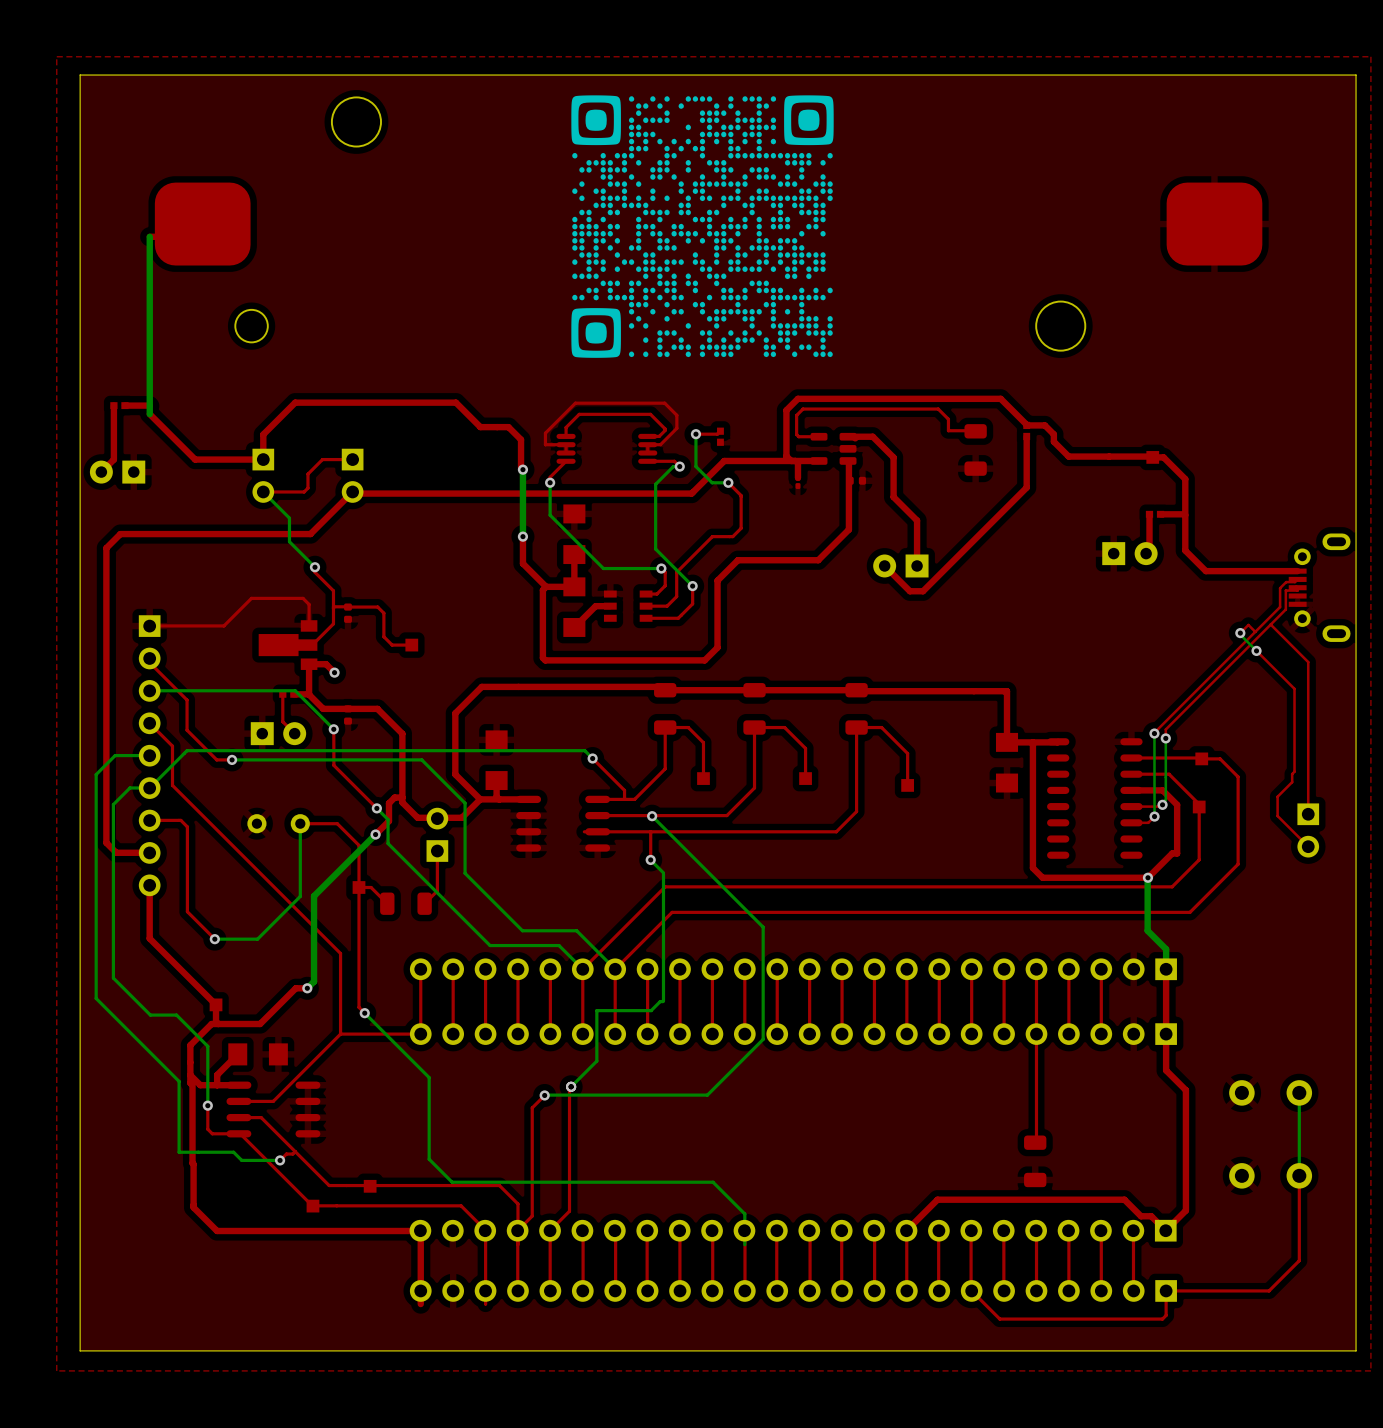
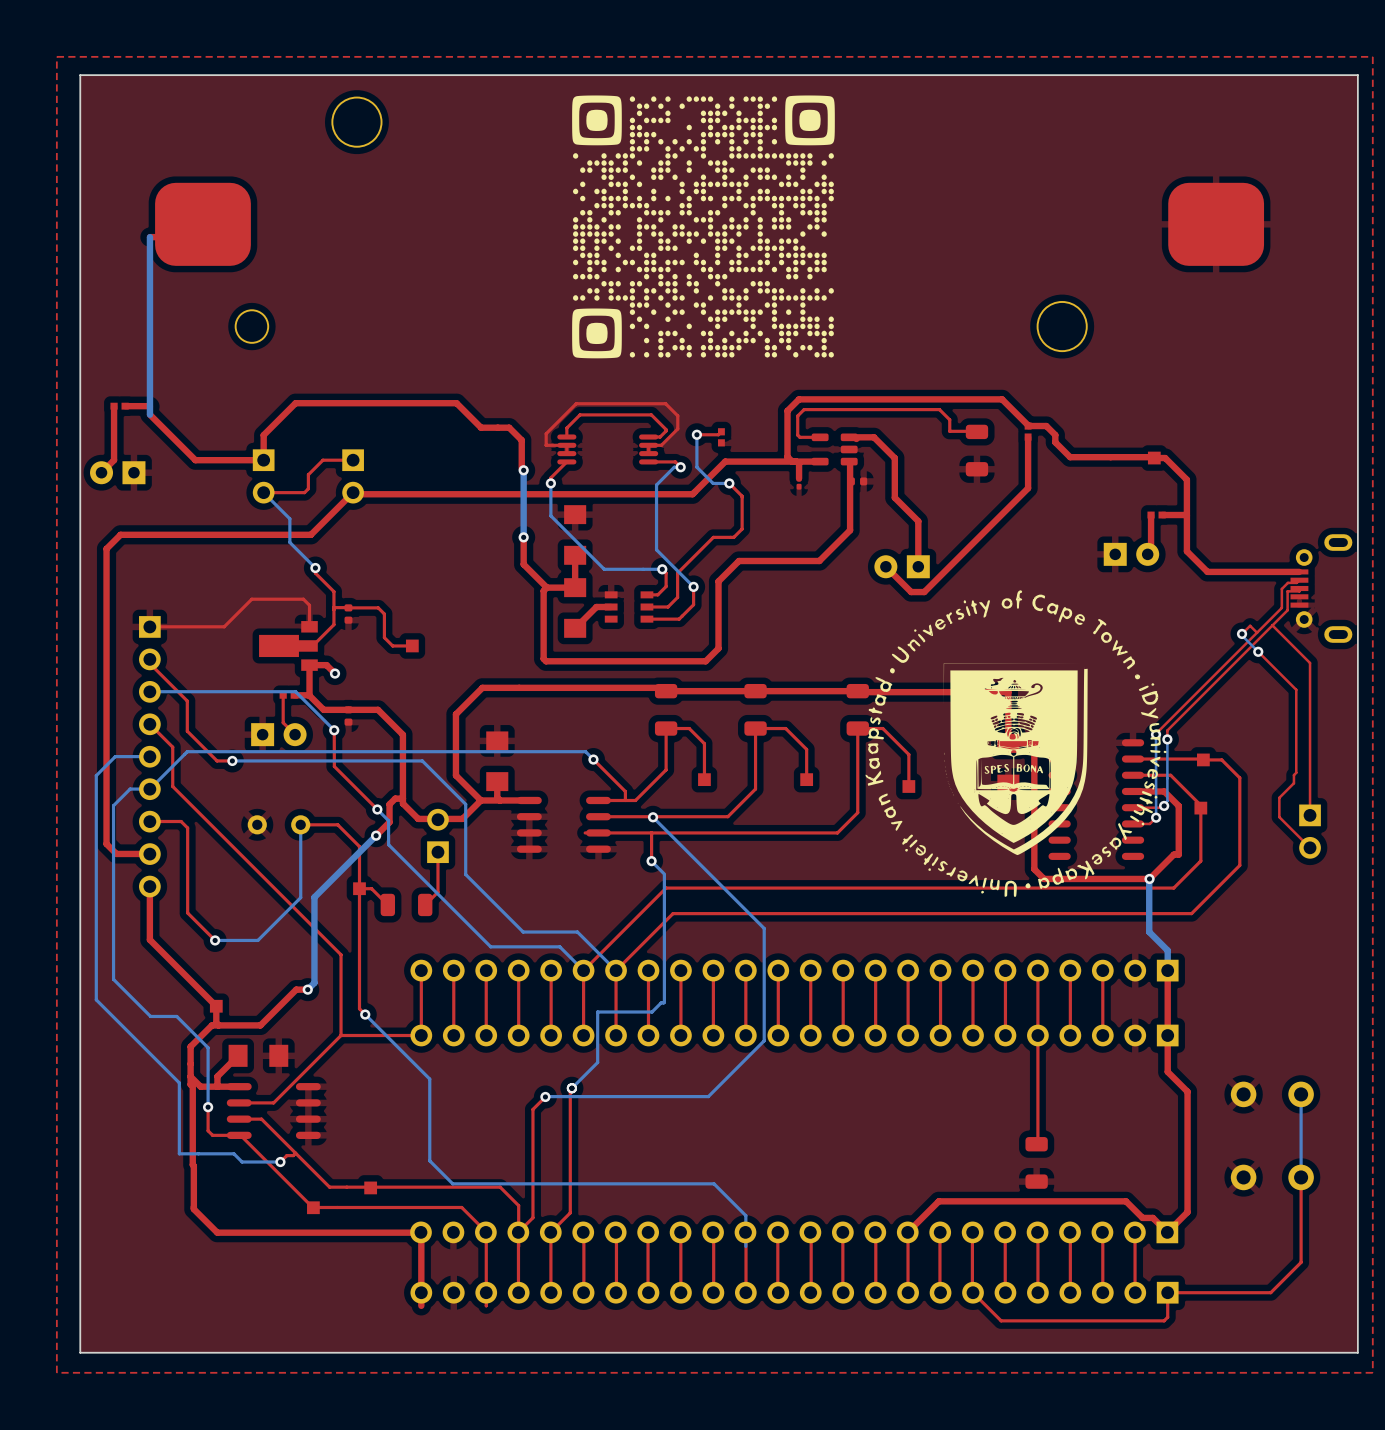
drawing: none -> [865, 590, 1167, 897]

